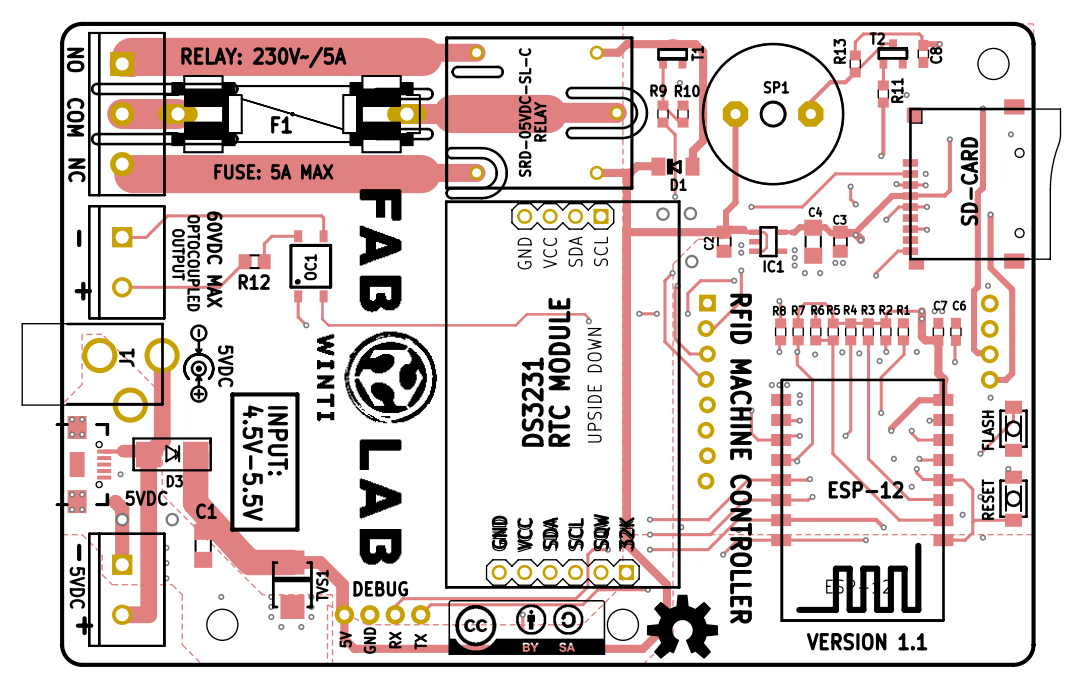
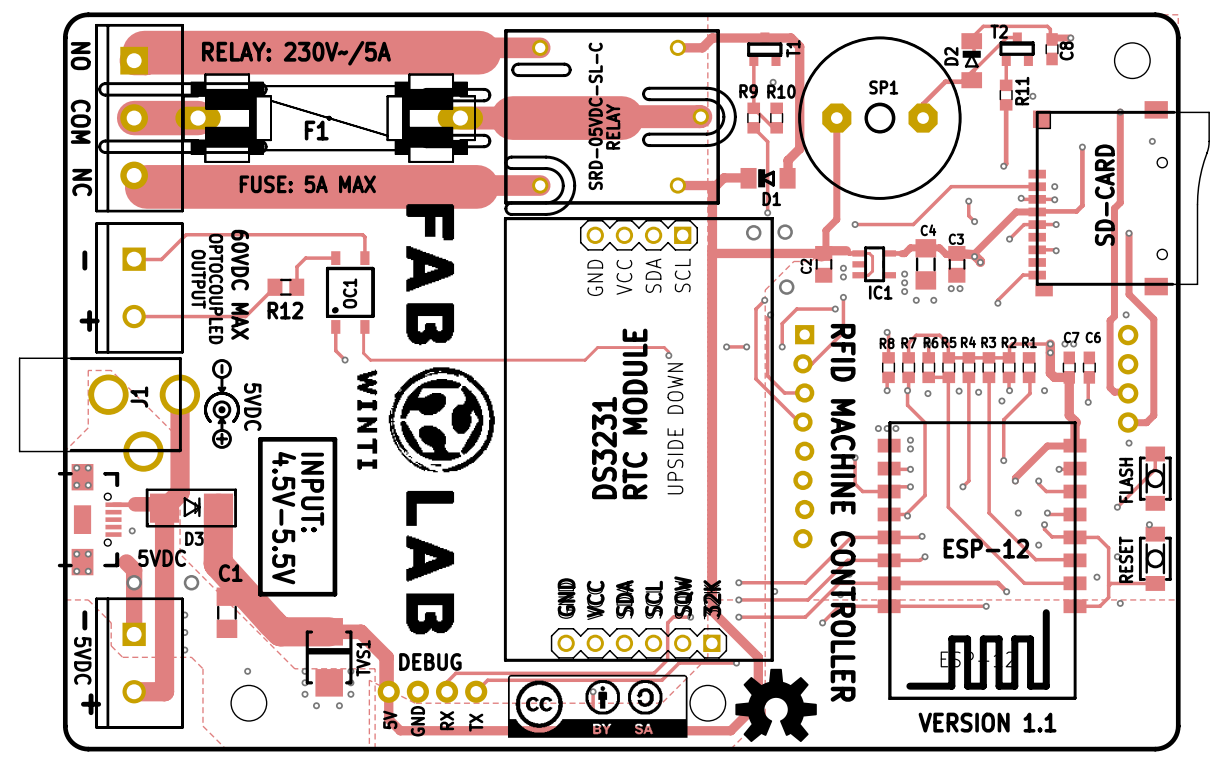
D2: none -> (971, 60)
R13: (855, 63) -> none

